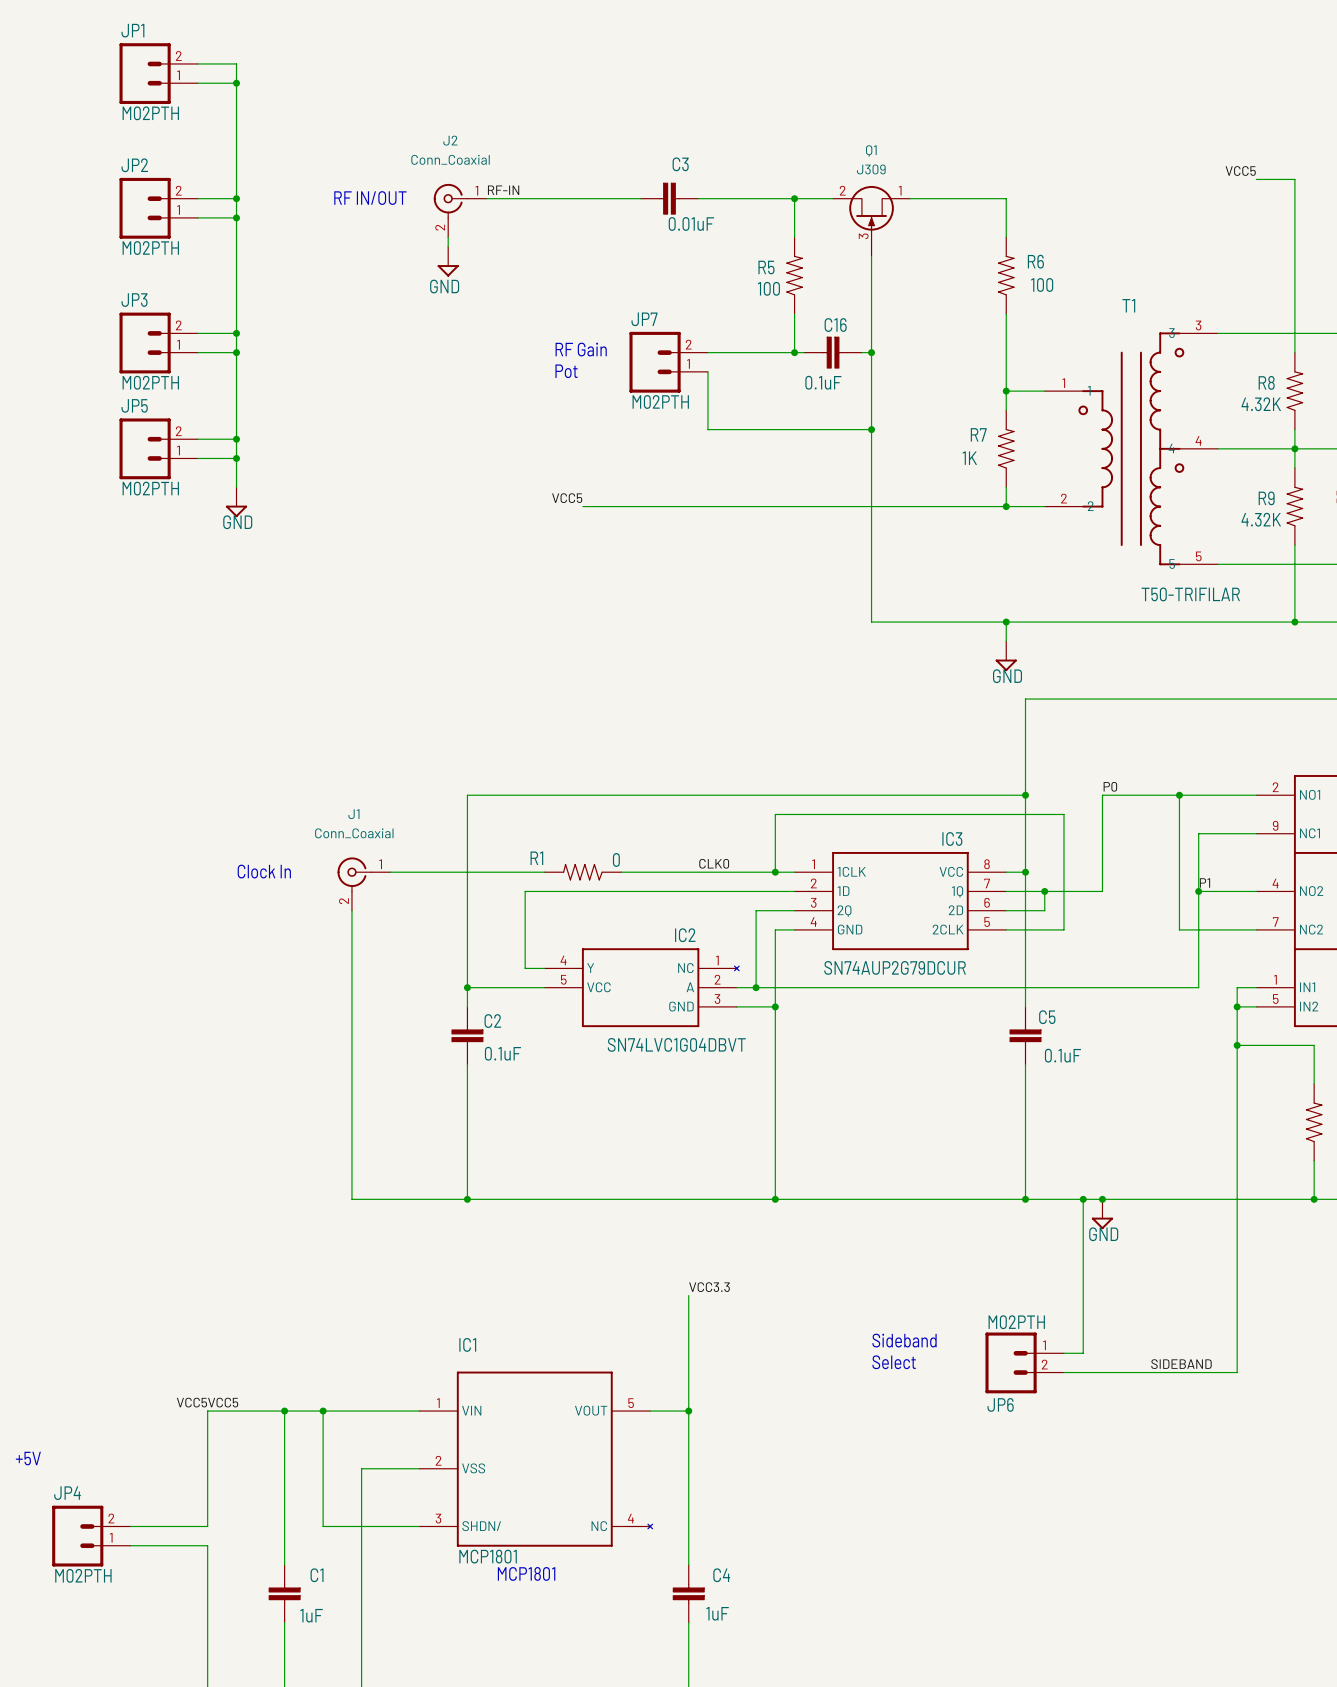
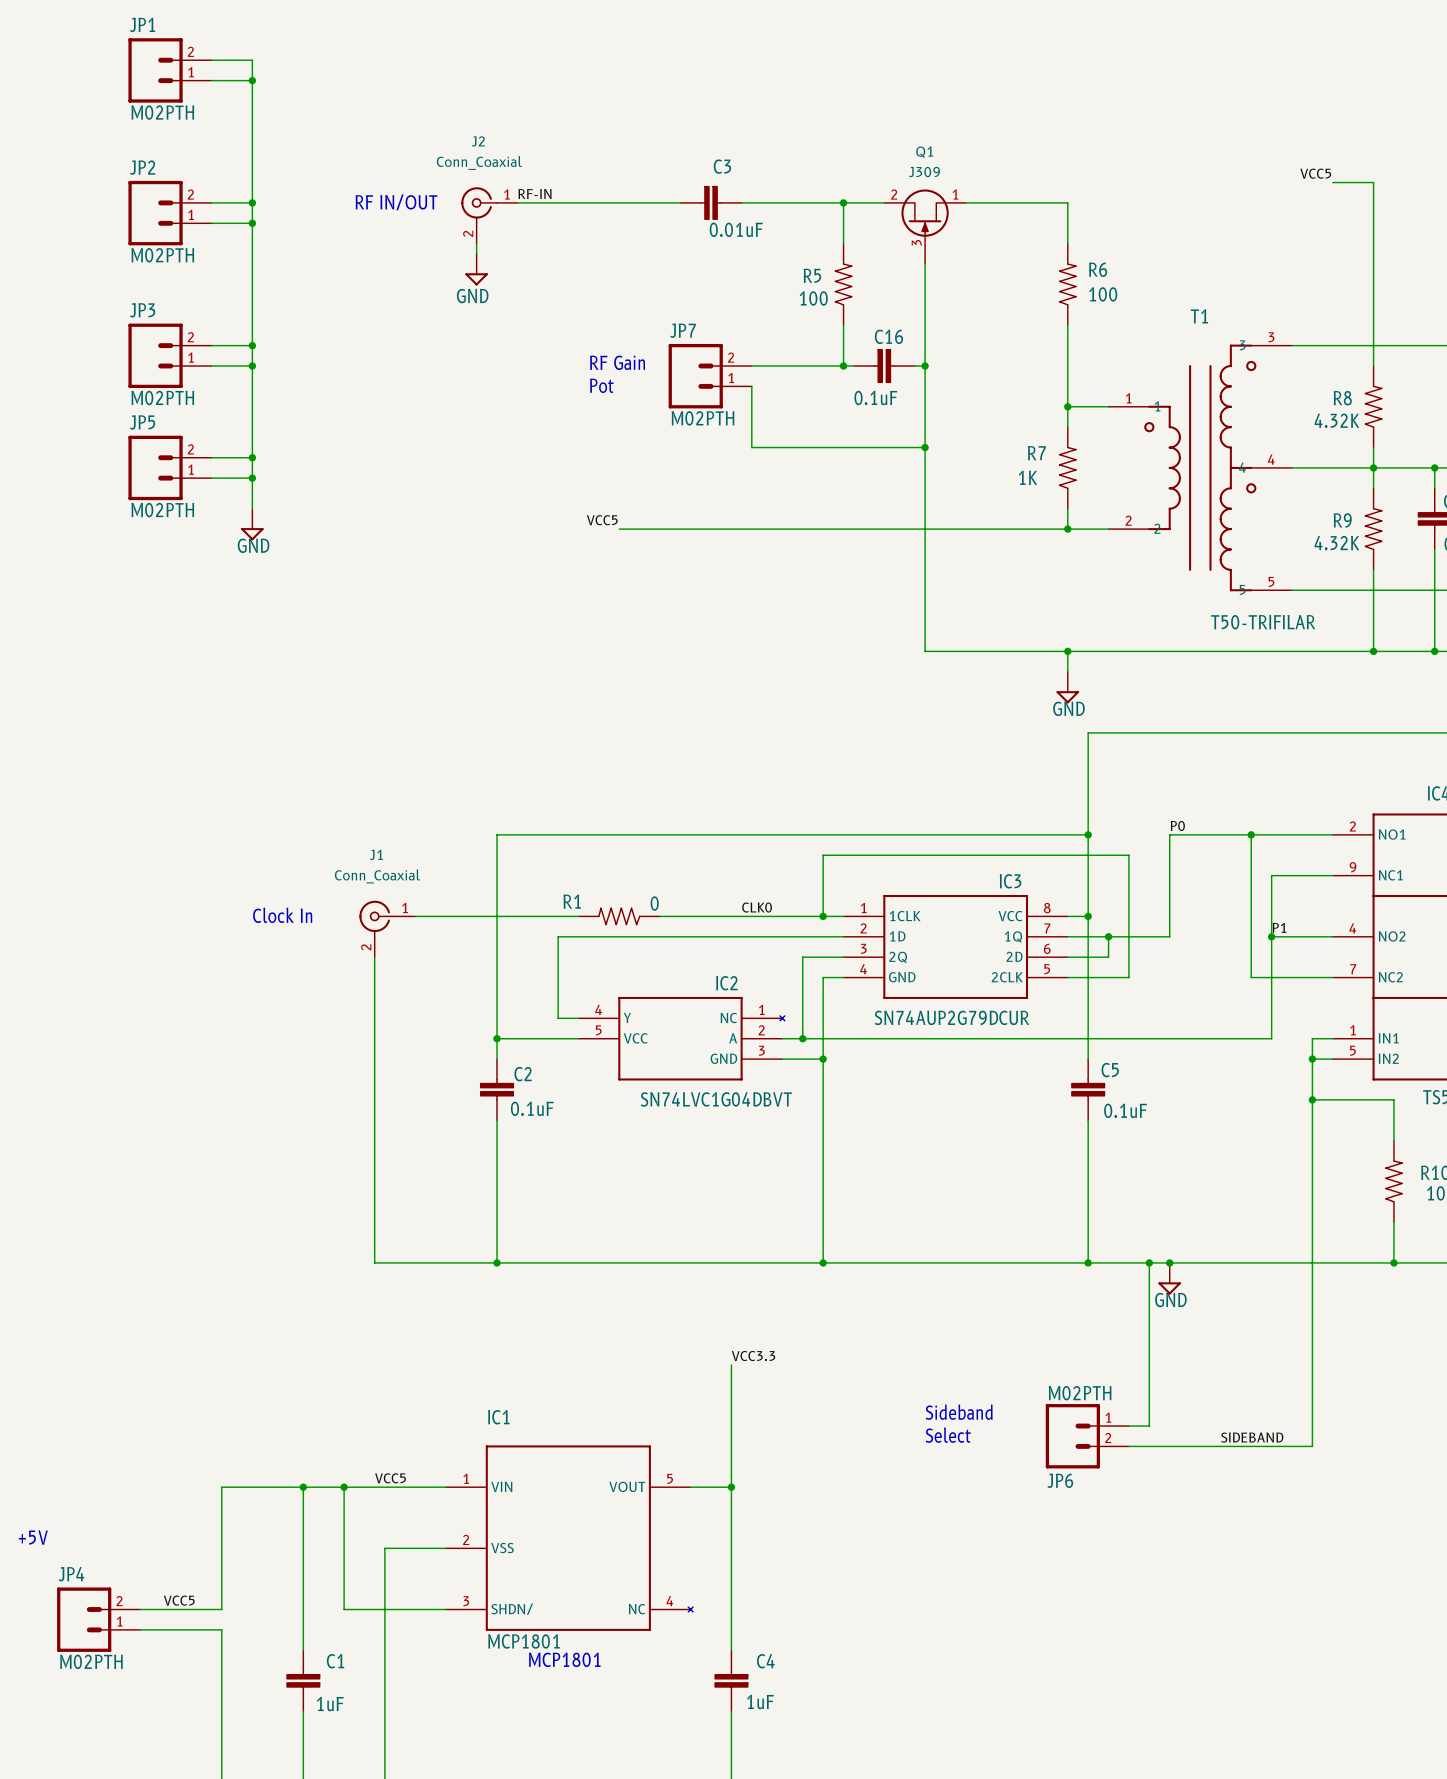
label: VCC5 (191, 1402) -> none
label: VCC5 (223, 1402) -> none
label: none -> VCC5 (390, 1478)
label: none -> VCC5 (179, 1600)

